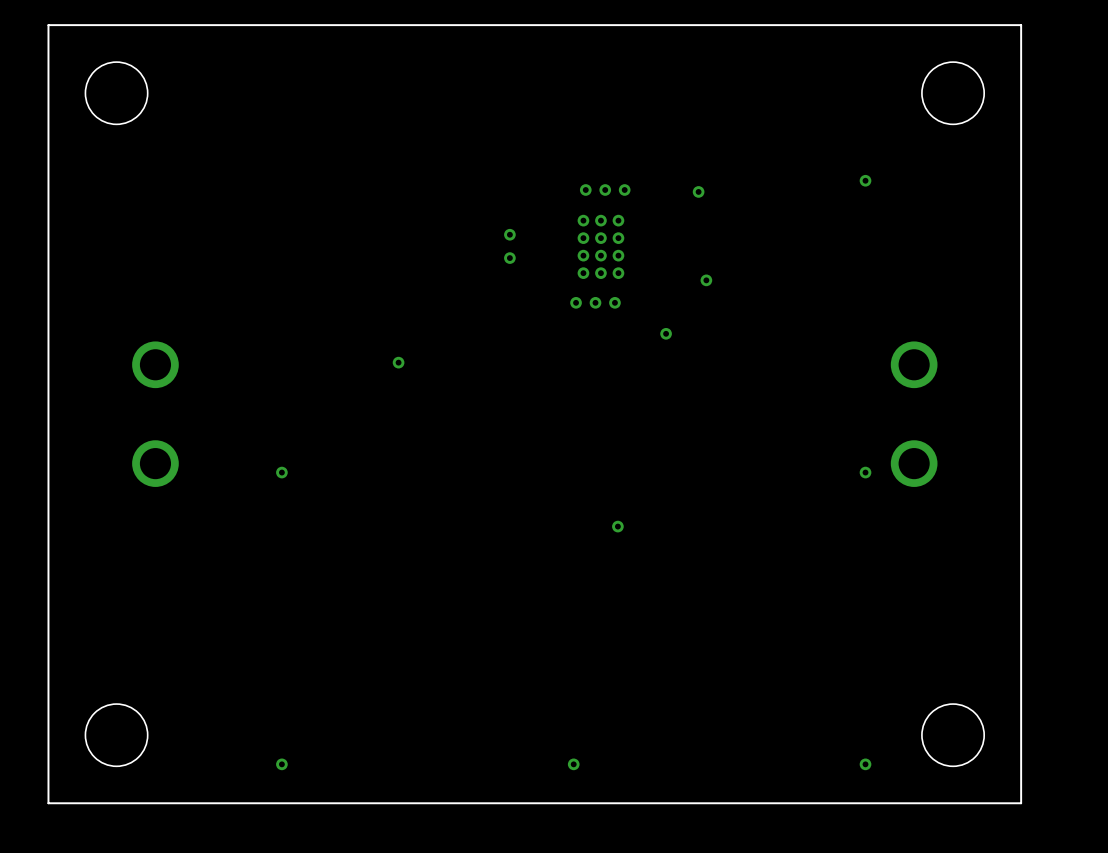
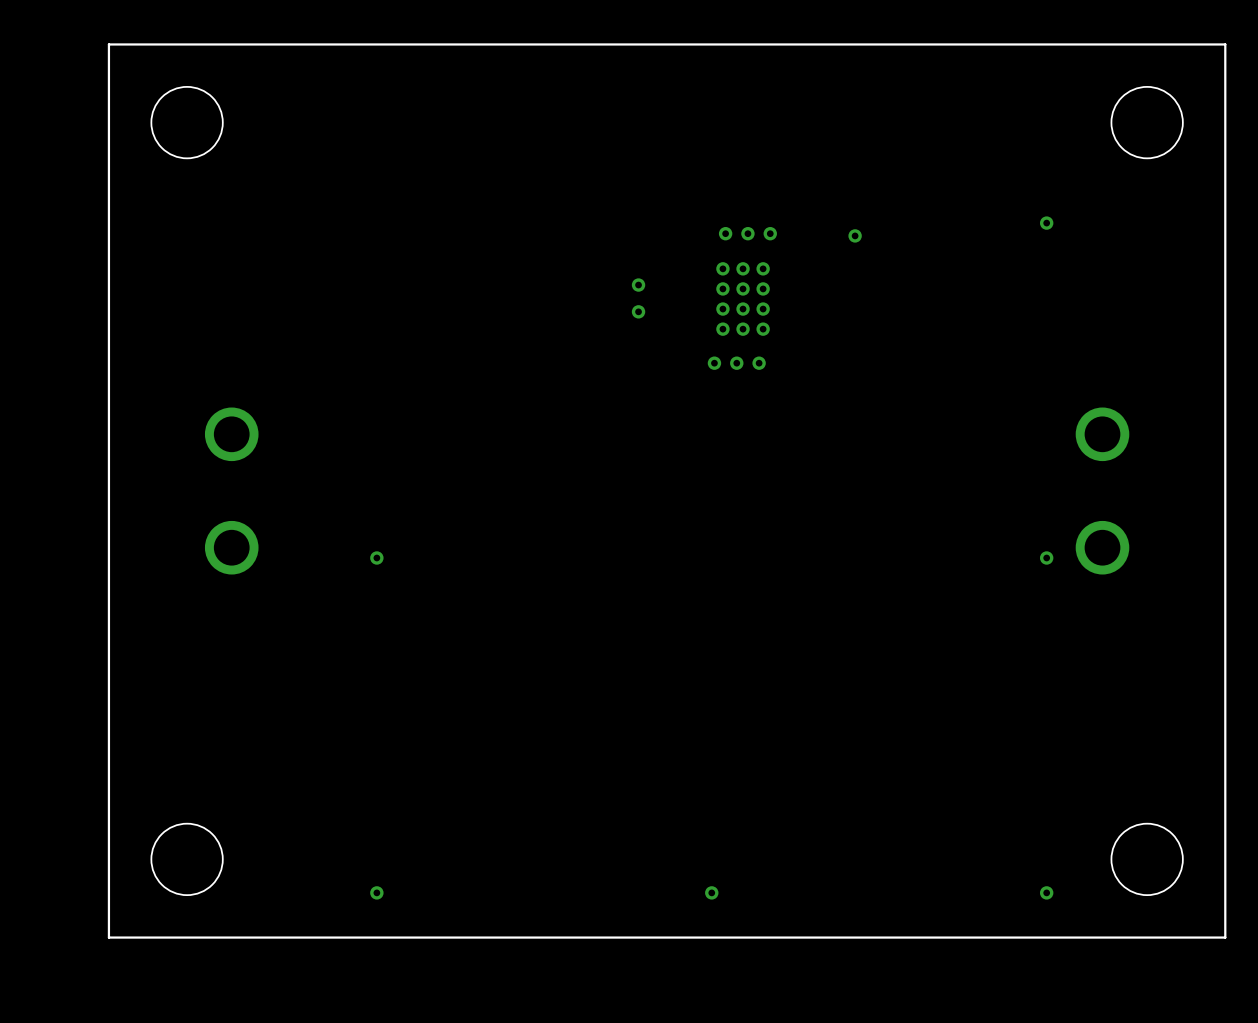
via: (706, 280) -> none
via: (666, 333) -> none
via: (398, 362) -> none
via: (617, 526) -> none

